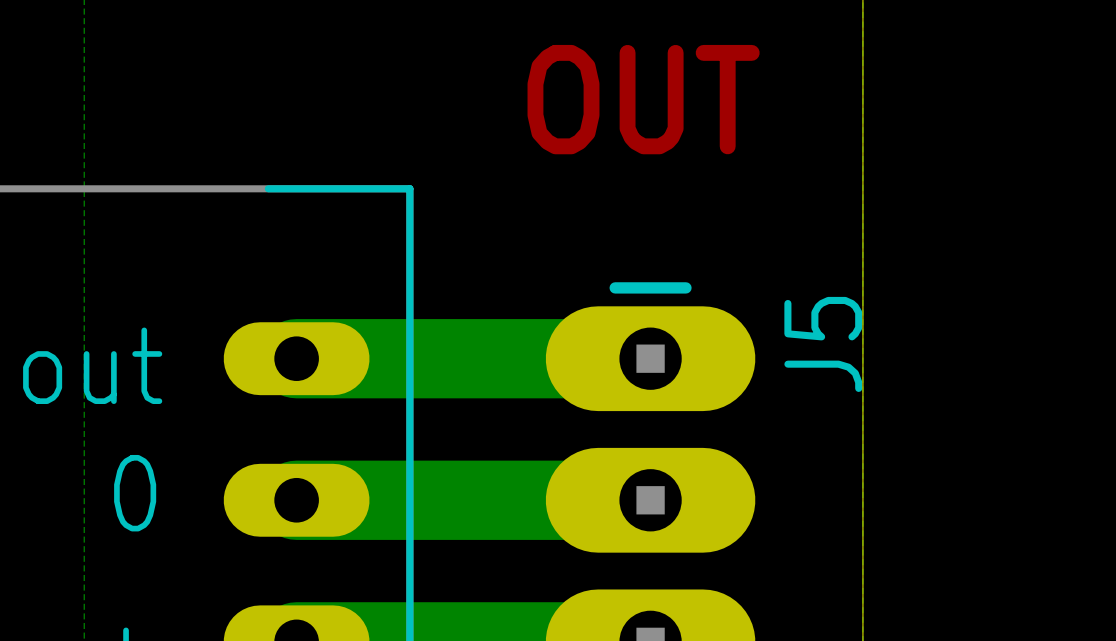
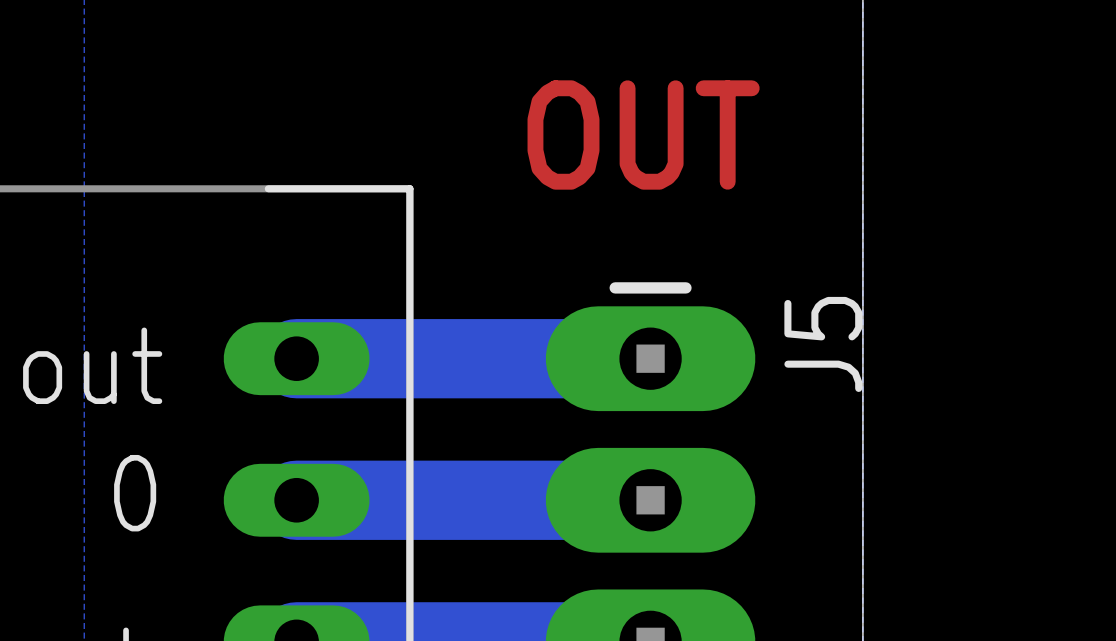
text position: OUT (643, 99) -> OUT (643, 135)

